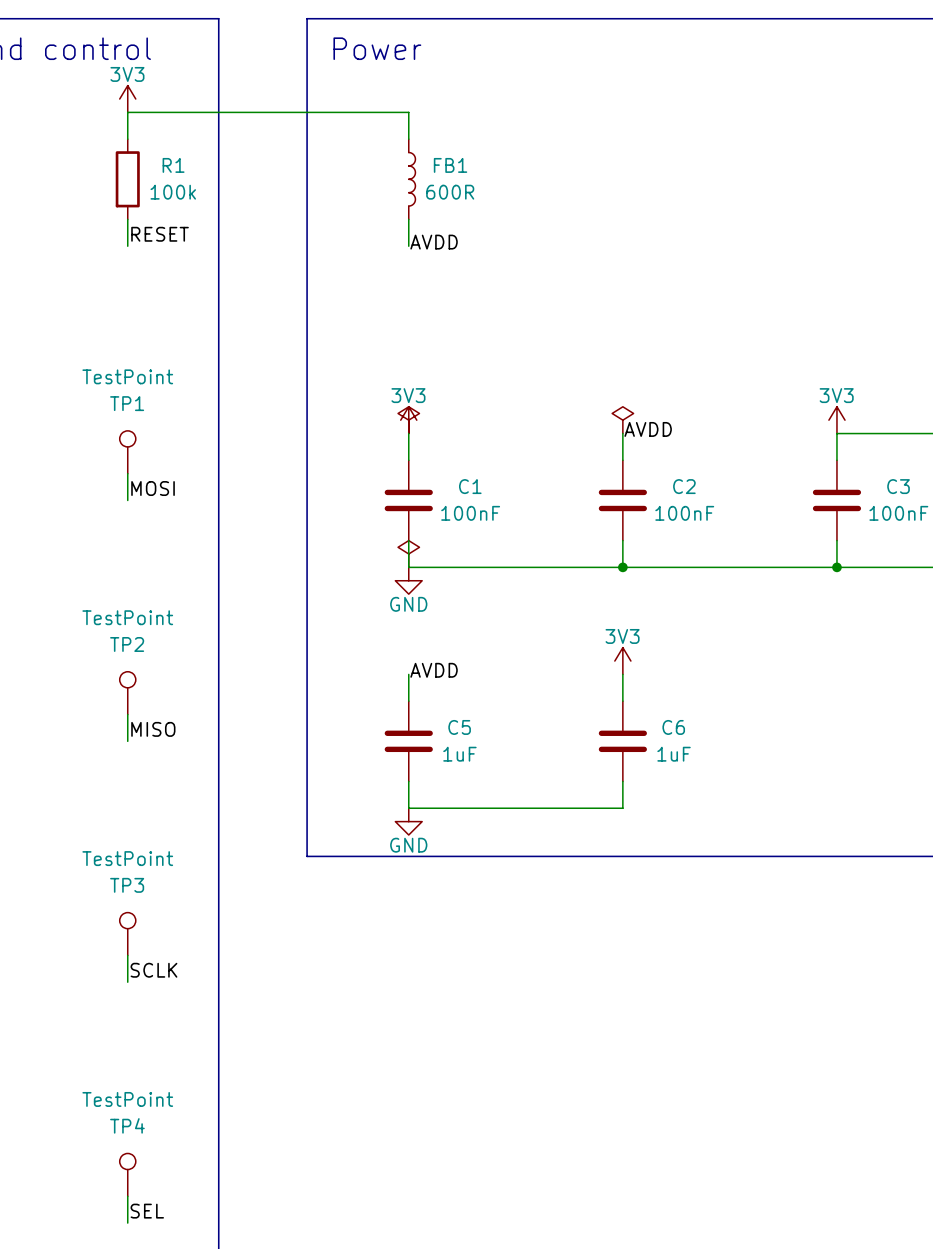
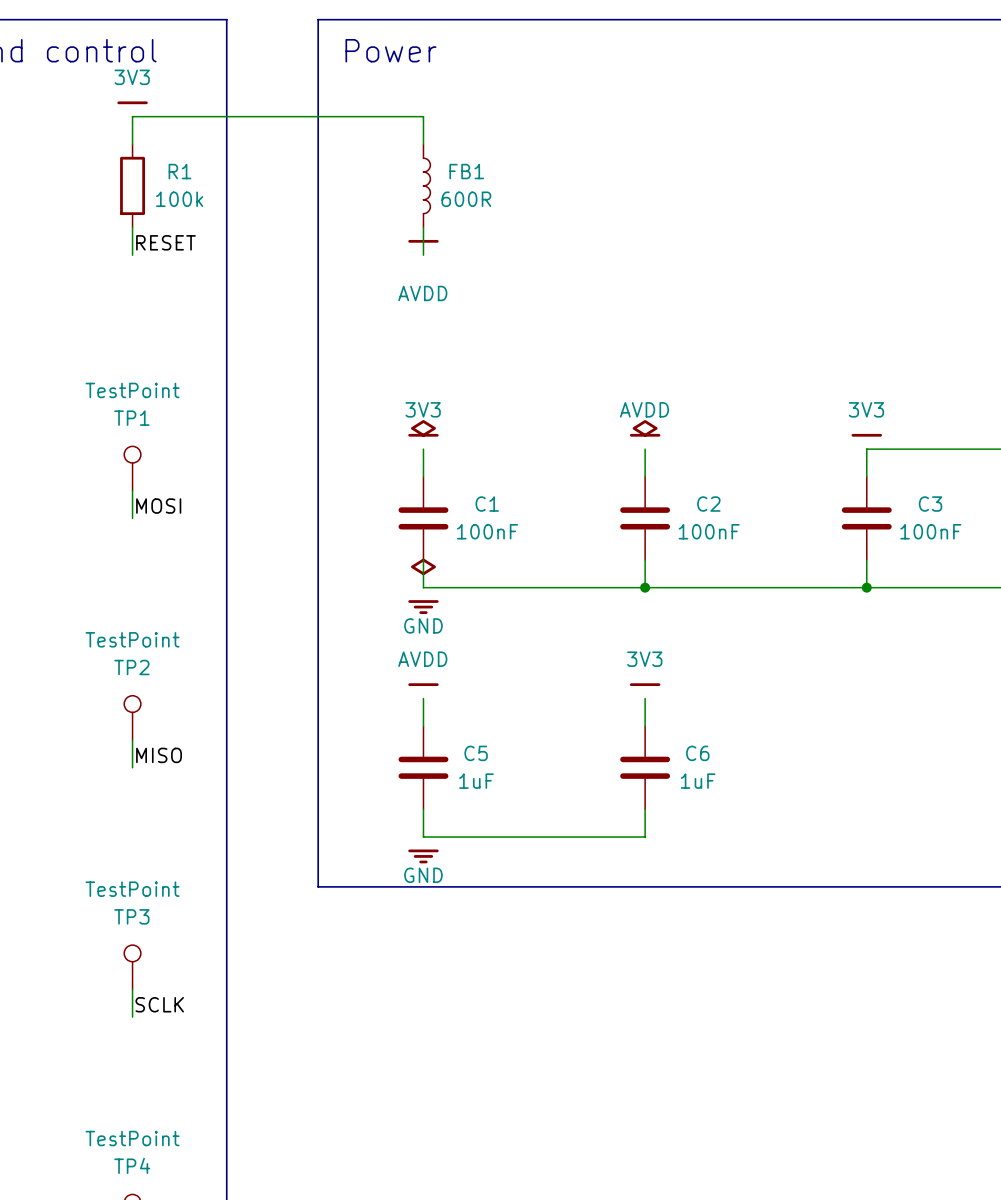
power symbol shape: [119, 85, 136, 113] -> [117, 101, 148, 105]
power symbol: none -> AVDD (423, 241)
label: AVDD (434, 242) -> none
power symbol text: none -> AVDD (644, 409)
power symbol shape: [612, 406, 634, 434] -> [629, 433, 661, 437]
power symbol shape: [828, 406, 846, 434] -> [851, 433, 883, 437]
power symbol: none -> (423, 428)
power symbol: none -> (645, 428)
power symbol: (408, 420) -> none
power symbol: 3V3 (408, 420) -> none
power symbol: none -> 3V3 (423, 435)
label: AVDD (648, 429) -> none
power symbol shape: [398, 540, 420, 568] -> [411, 558, 436, 576]
power symbol shape: [395, 567, 423, 595] -> [408, 600, 439, 614]
power symbol shape: [614, 647, 631, 675] -> [629, 683, 661, 687]
power symbol: none -> AVDD (423, 684)
label: AVDD (434, 670) -> none
power symbol shape: [395, 808, 423, 836] -> [408, 849, 439, 864]

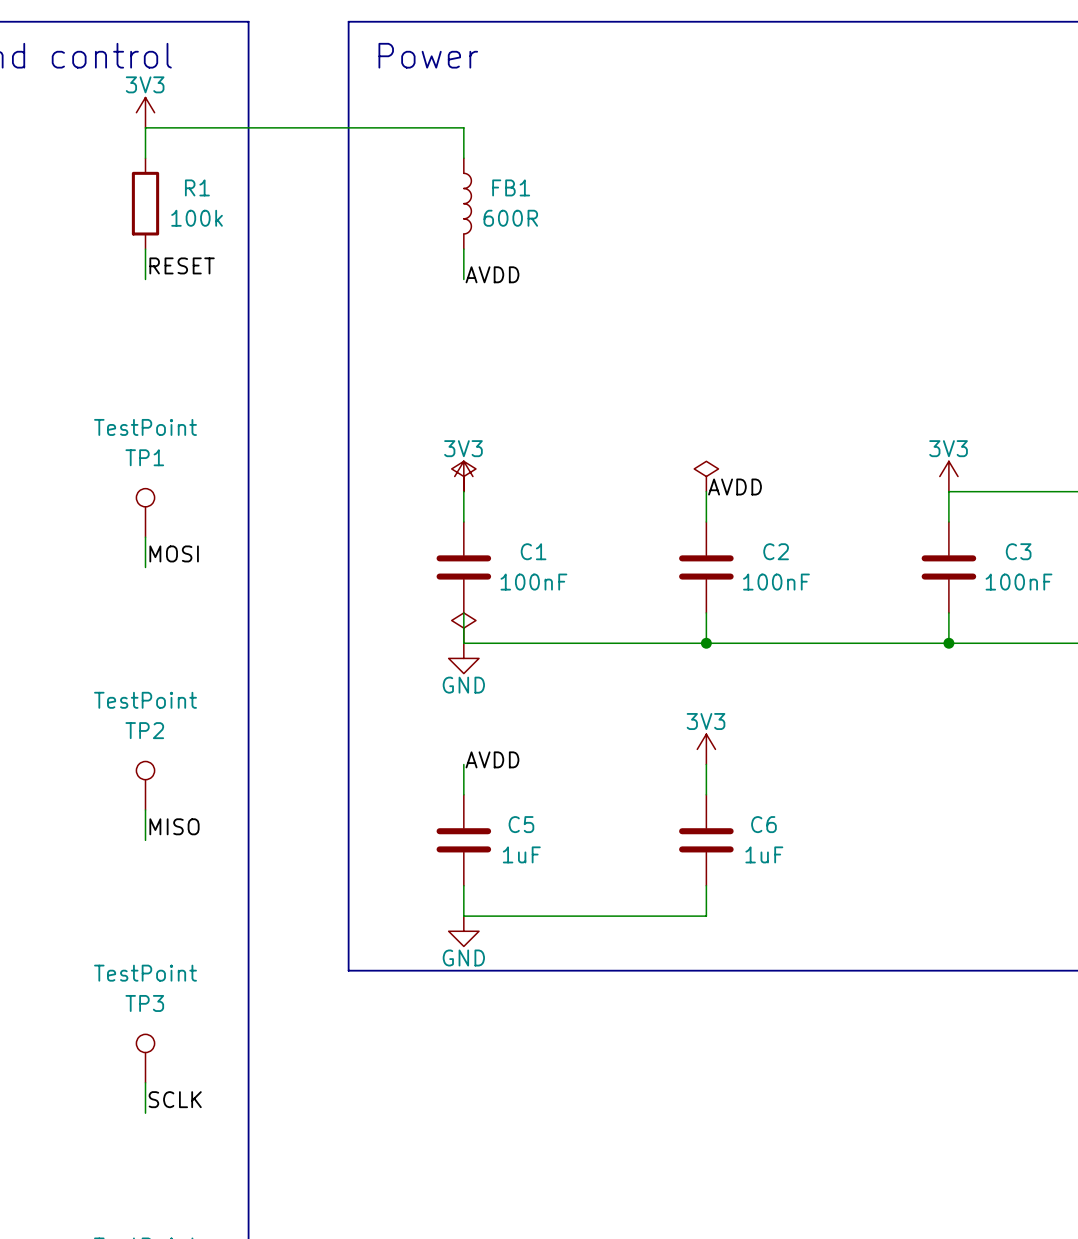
power symbol shape: [117, 101, 148, 105] -> [136, 97, 155, 128]
power symbol: AVDD (423, 241) -> none
label: none -> AVDD (492, 274)
power symbol text: AVDD (644, 409) -> none
power symbol: (423, 428) -> none
power symbol: (645, 428) -> none
power symbol shape: [629, 433, 661, 437] -> [694, 461, 719, 492]
power symbol shape: [851, 433, 883, 437] -> [939, 461, 959, 492]
power symbol: 3V3 (423, 435) -> none
power symbol: none -> (463, 476)
power symbol: none -> 3V3 (463, 476)
label: none -> AVDD (735, 487)
power symbol shape: [411, 558, 436, 576] -> [451, 612, 476, 644]
power symbol shape: [408, 600, 439, 614] -> [448, 643, 479, 674]
power symbol shape: [629, 683, 661, 687] -> [697, 734, 716, 765]
power symbol: AVDD (423, 684) -> none
label: none -> AVDD (492, 759)
power symbol shape: [408, 849, 439, 864] -> [448, 916, 479, 947]

